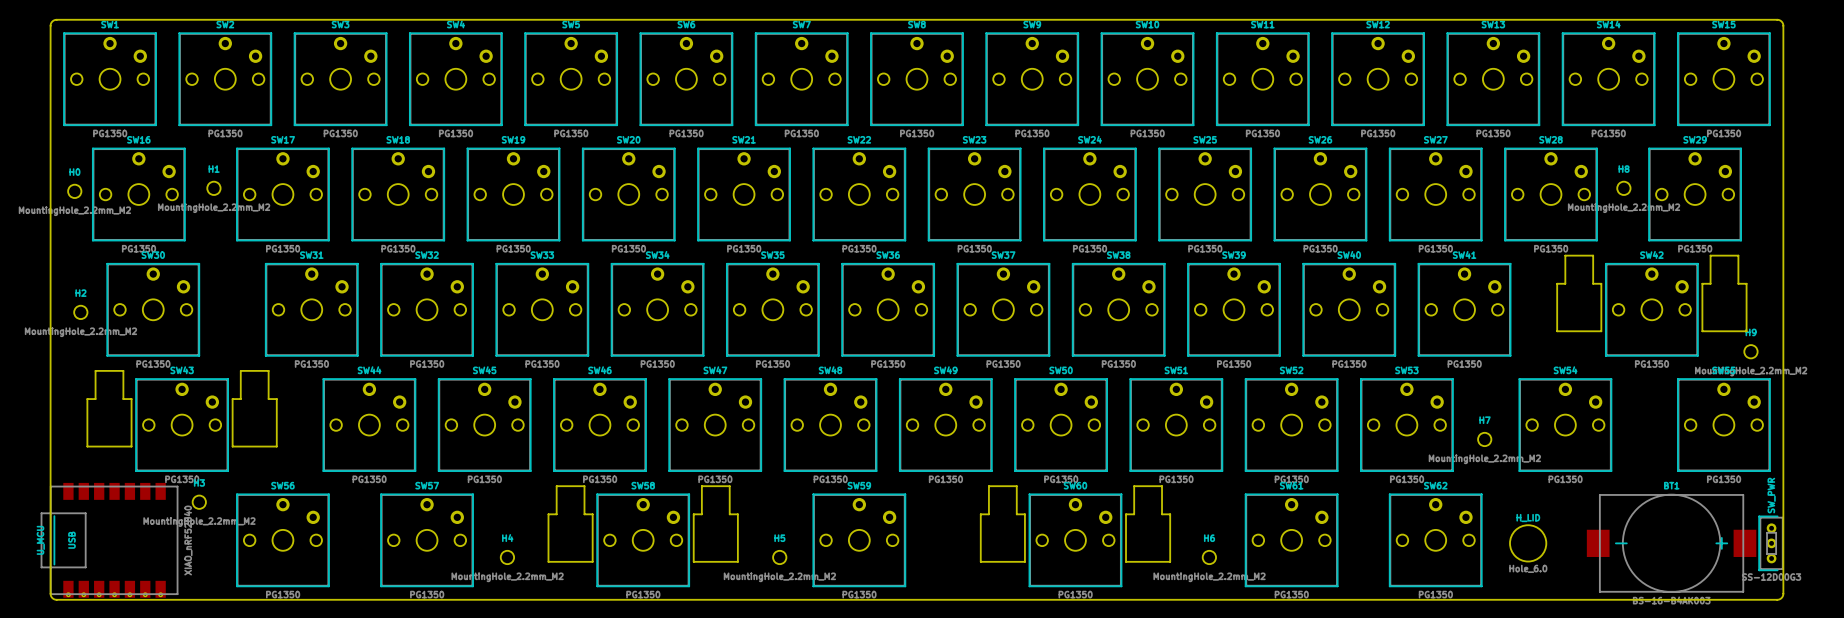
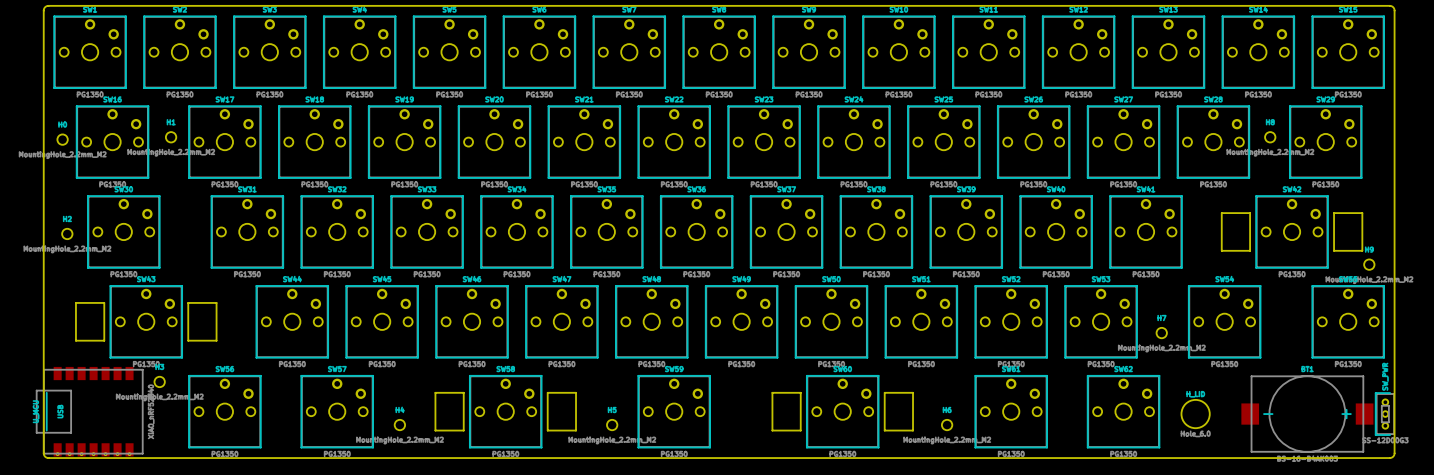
board edge: (1565, 255) (1565, 283) (1557, 283) (1557, 331) (1601, 331) (1601, 283) (1593, 283) (1593, 255) (1565, 255) -> none
board edge: (1710, 255) (1738, 255) (1738, 283) (1746, 283) (1746, 331) (1702, 331) (1702, 283) (1710, 283) (1710, 255) -> none
board edge: none -> (1221, 213) (1221, 250) (1250, 250) (1250, 213) (1221, 213)
board edge: none -> (1334, 213) (1362, 213) (1362, 250) (1334, 250) (1334, 213)
board edge: (95, 370) (95, 399) (87, 399) (87, 446) (131, 446) (131, 399) (123, 399) (123, 370) (95, 370) -> none
board edge: (240, 370) (268, 370) (268, 399) (276, 399) (276, 446) (232, 446) (232, 399) (240, 399) (240, 370) -> none
board edge: none -> (75, 302) (75, 340) (104, 340) (104, 302) (75, 302)
board edge: none -> (188, 302) (216, 302) (216, 340) (188, 340) (188, 302)
board edge: (556, 486) (556, 514) (548, 514) (548, 561) (592, 561) (592, 514) (584, 514) (584, 486) (556, 486) -> none
board edge: (701, 486) (729, 486) (729, 514) (737, 514) (737, 561) (693, 561) (693, 514) (701, 514) (701, 486) -> none
board edge: (988, 486) (1016, 486) (1016, 514) (1024, 514) (1024, 561) (980, 561) (980, 514) (988, 514) (988, 486) -> none
board edge: (1134, 486) (1162, 486) (1162, 514) (1170, 514) (1170, 561) (1126, 561) (1126, 514) (1134, 514) (1134, 486) -> none
board edge: none -> (435, 392) (435, 430) (463, 430) (463, 392) (435, 392)
board edge: none -> (547, 392) (576, 392) (576, 430) (547, 430) (547, 392)
board edge: none -> (772, 392) (800, 392) (800, 430) (772, 430) (772, 392)
board edge: none -> (884, 392) (913, 392) (913, 430) (884, 430) (884, 392)

